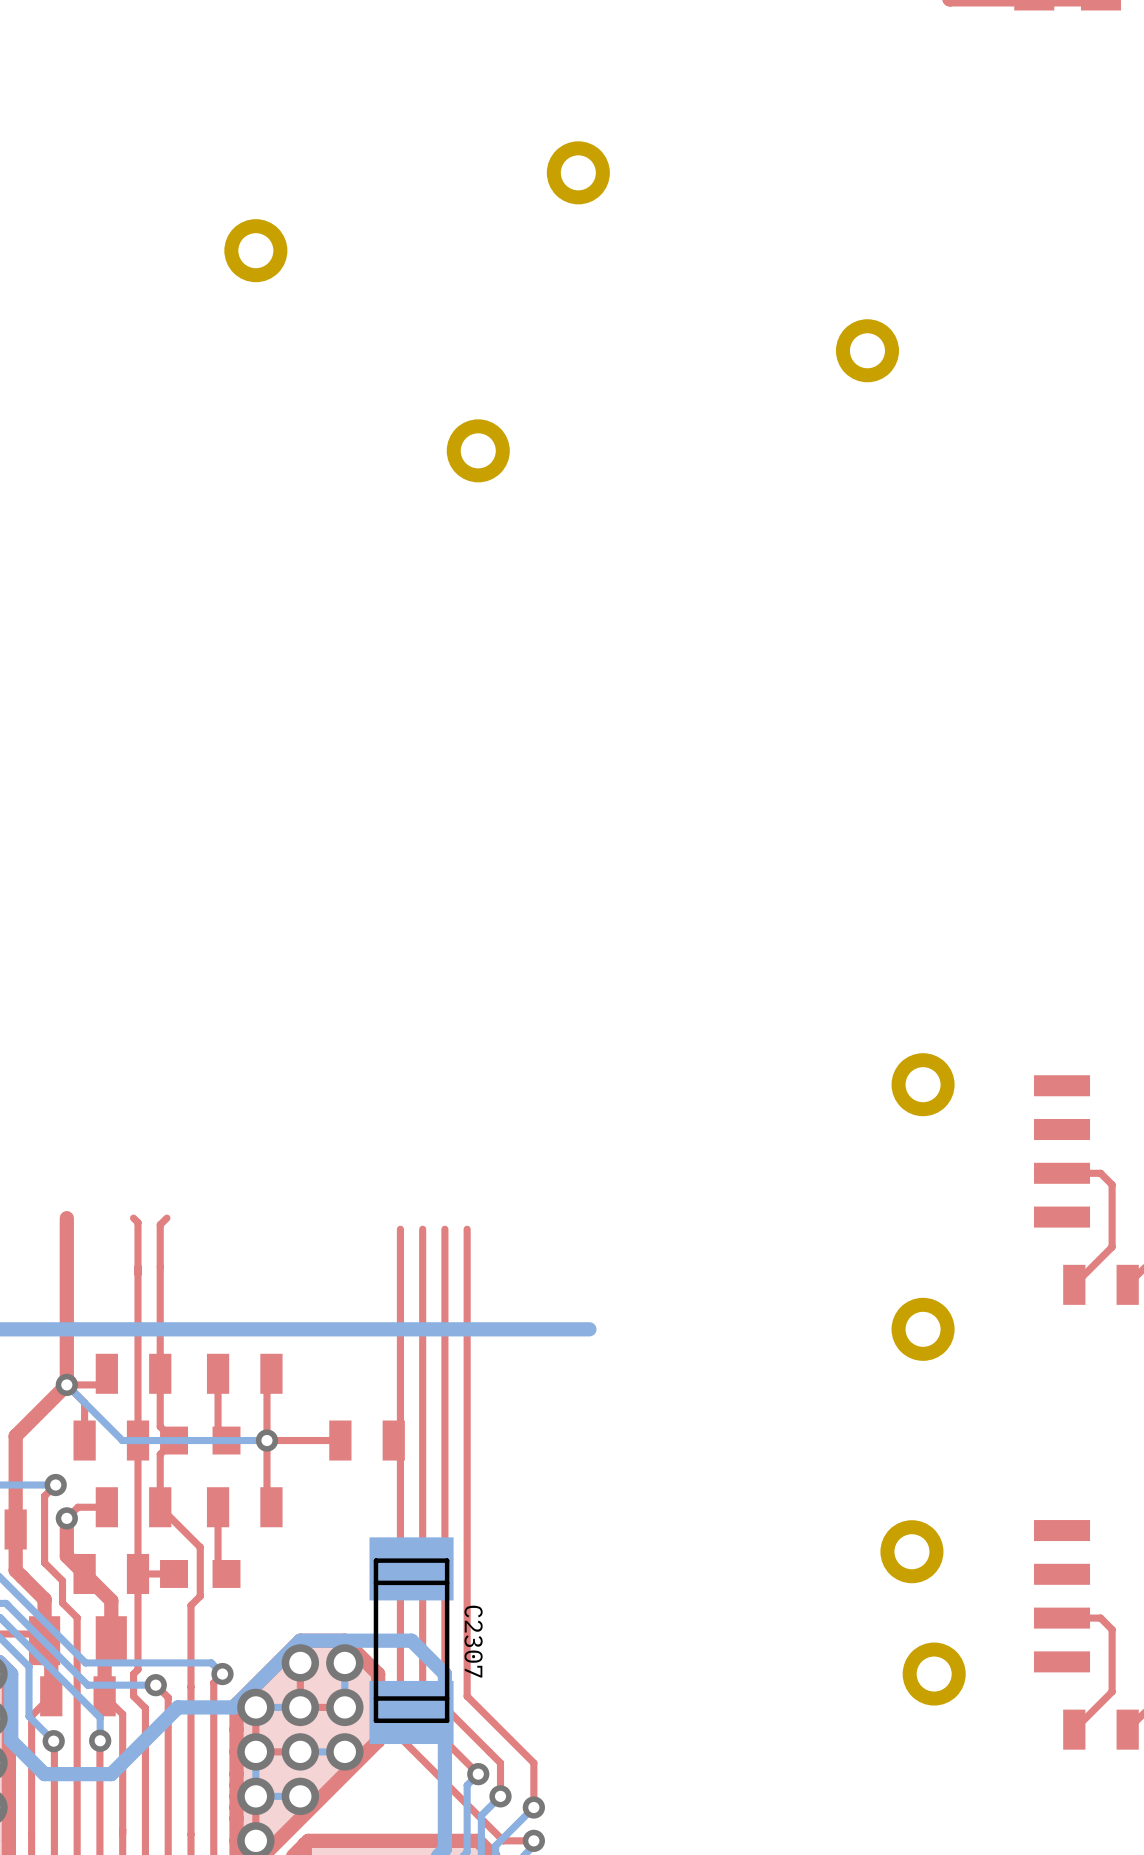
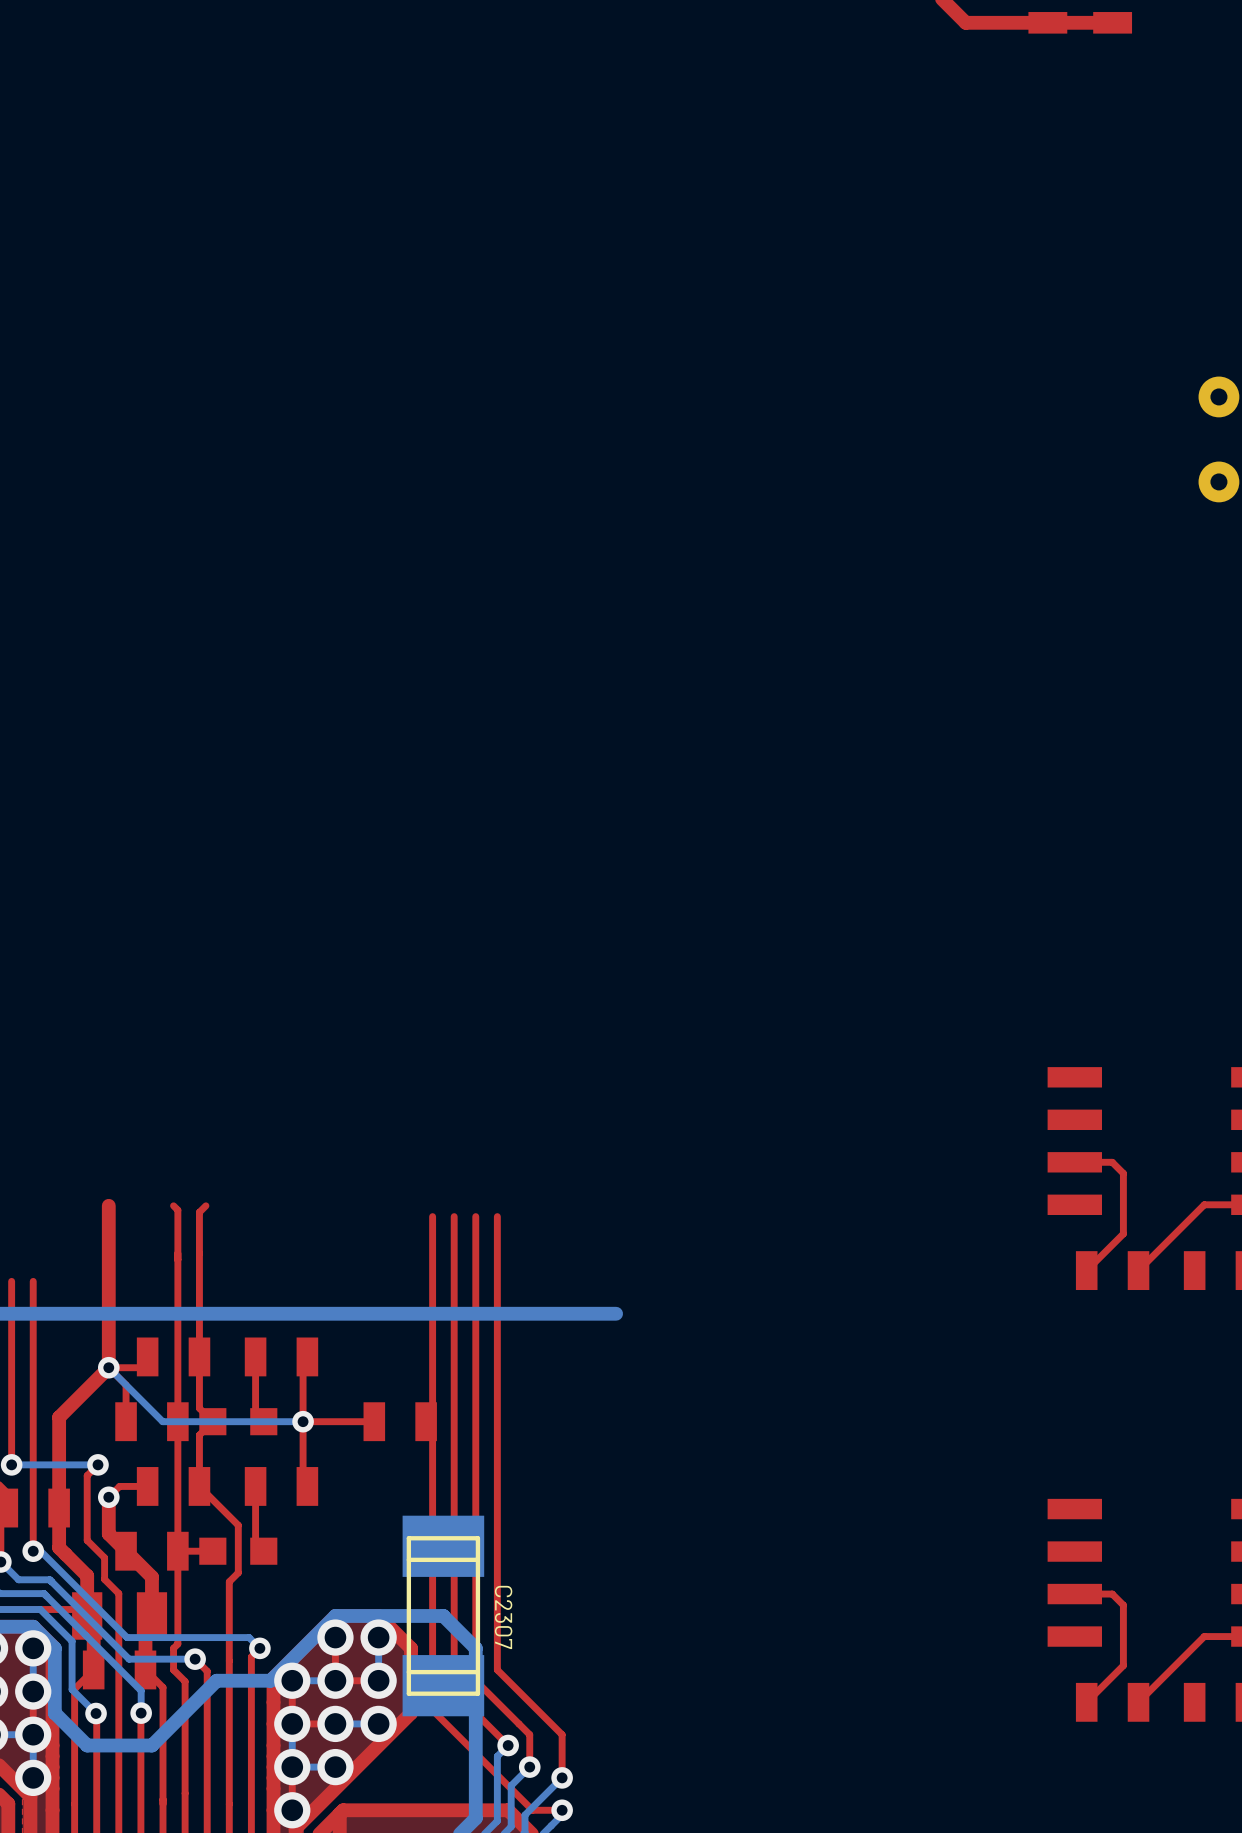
part: (578, 172) -> none
part: (255, 250) -> none
part: (867, 350) -> none
part: (478, 450) -> none
part: (923, 1084) -> none
part: (923, 1329) -> none
part: (911, 1551) -> none
part: (934, 1674) -> none

